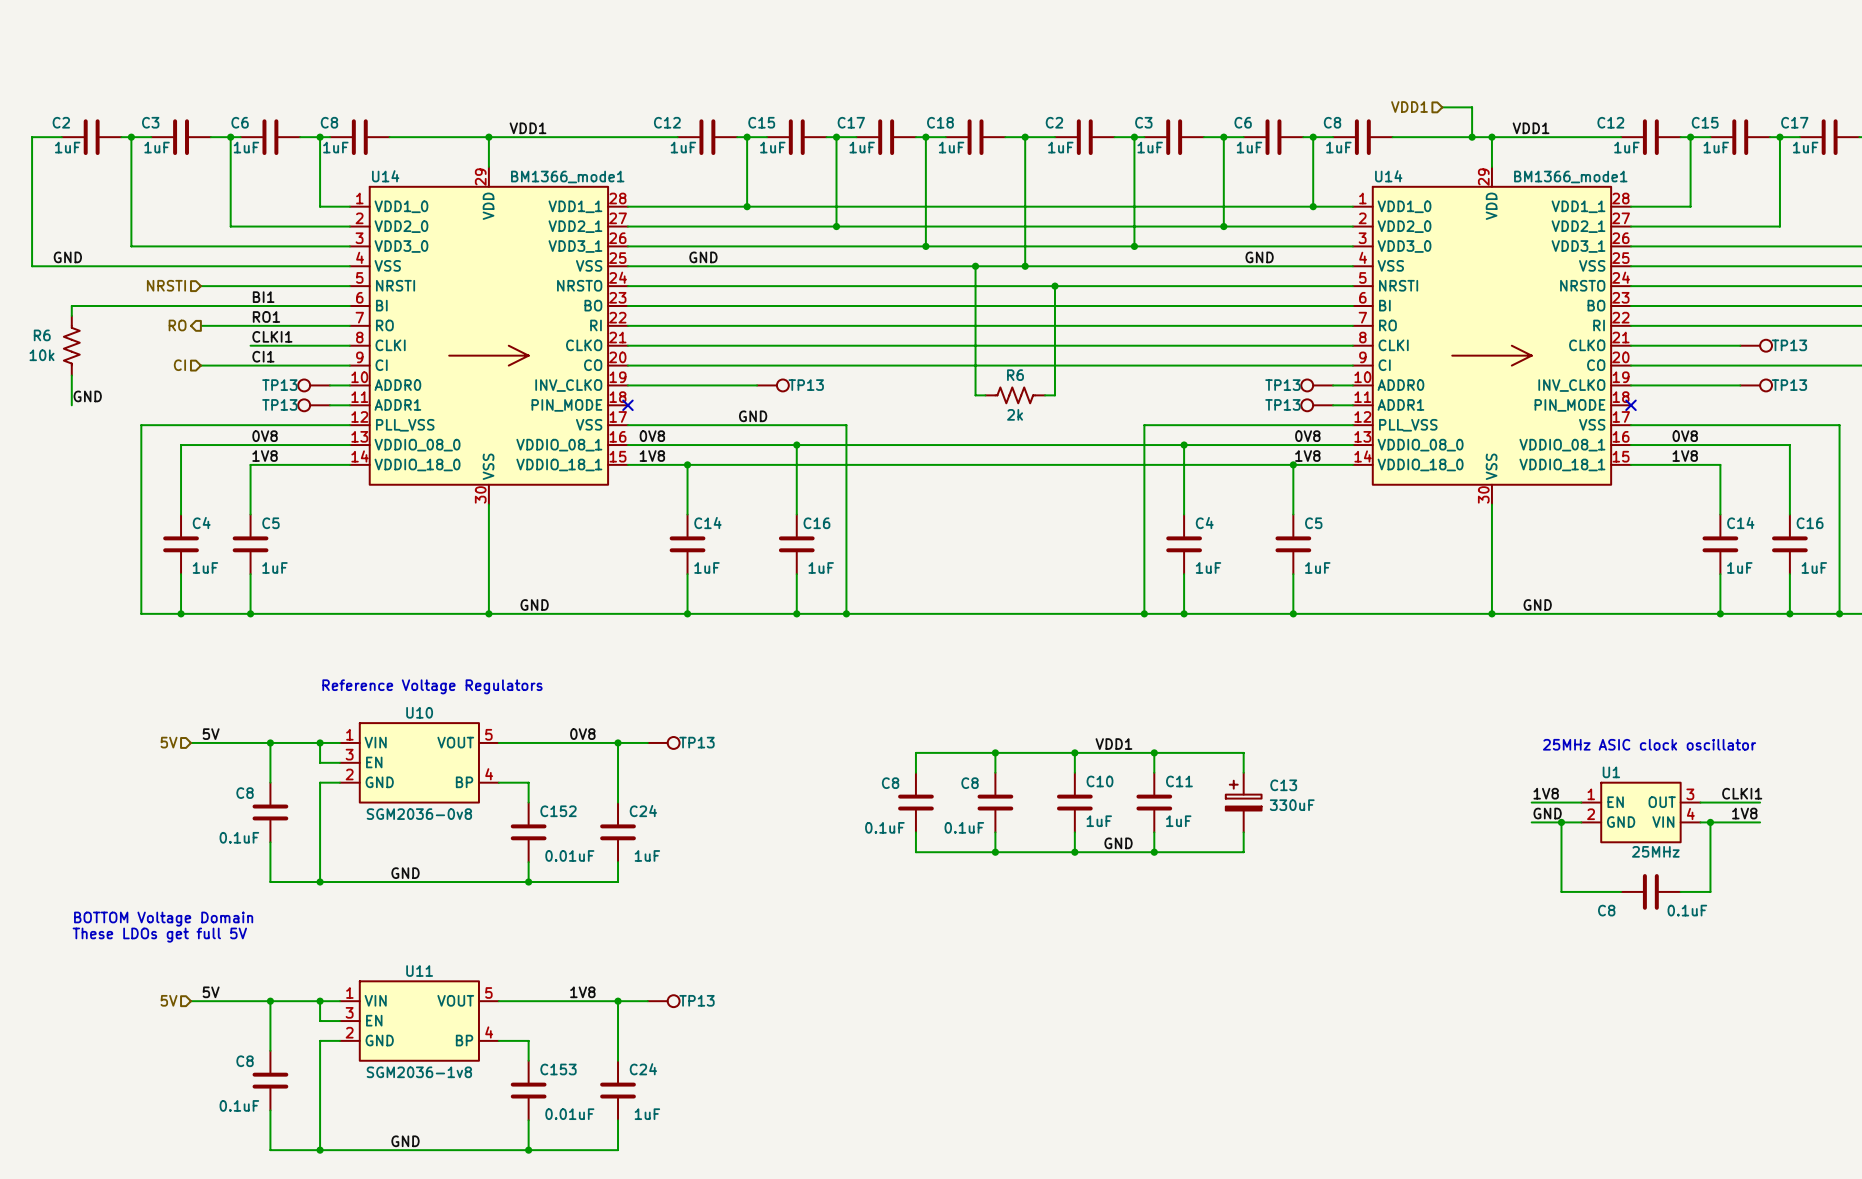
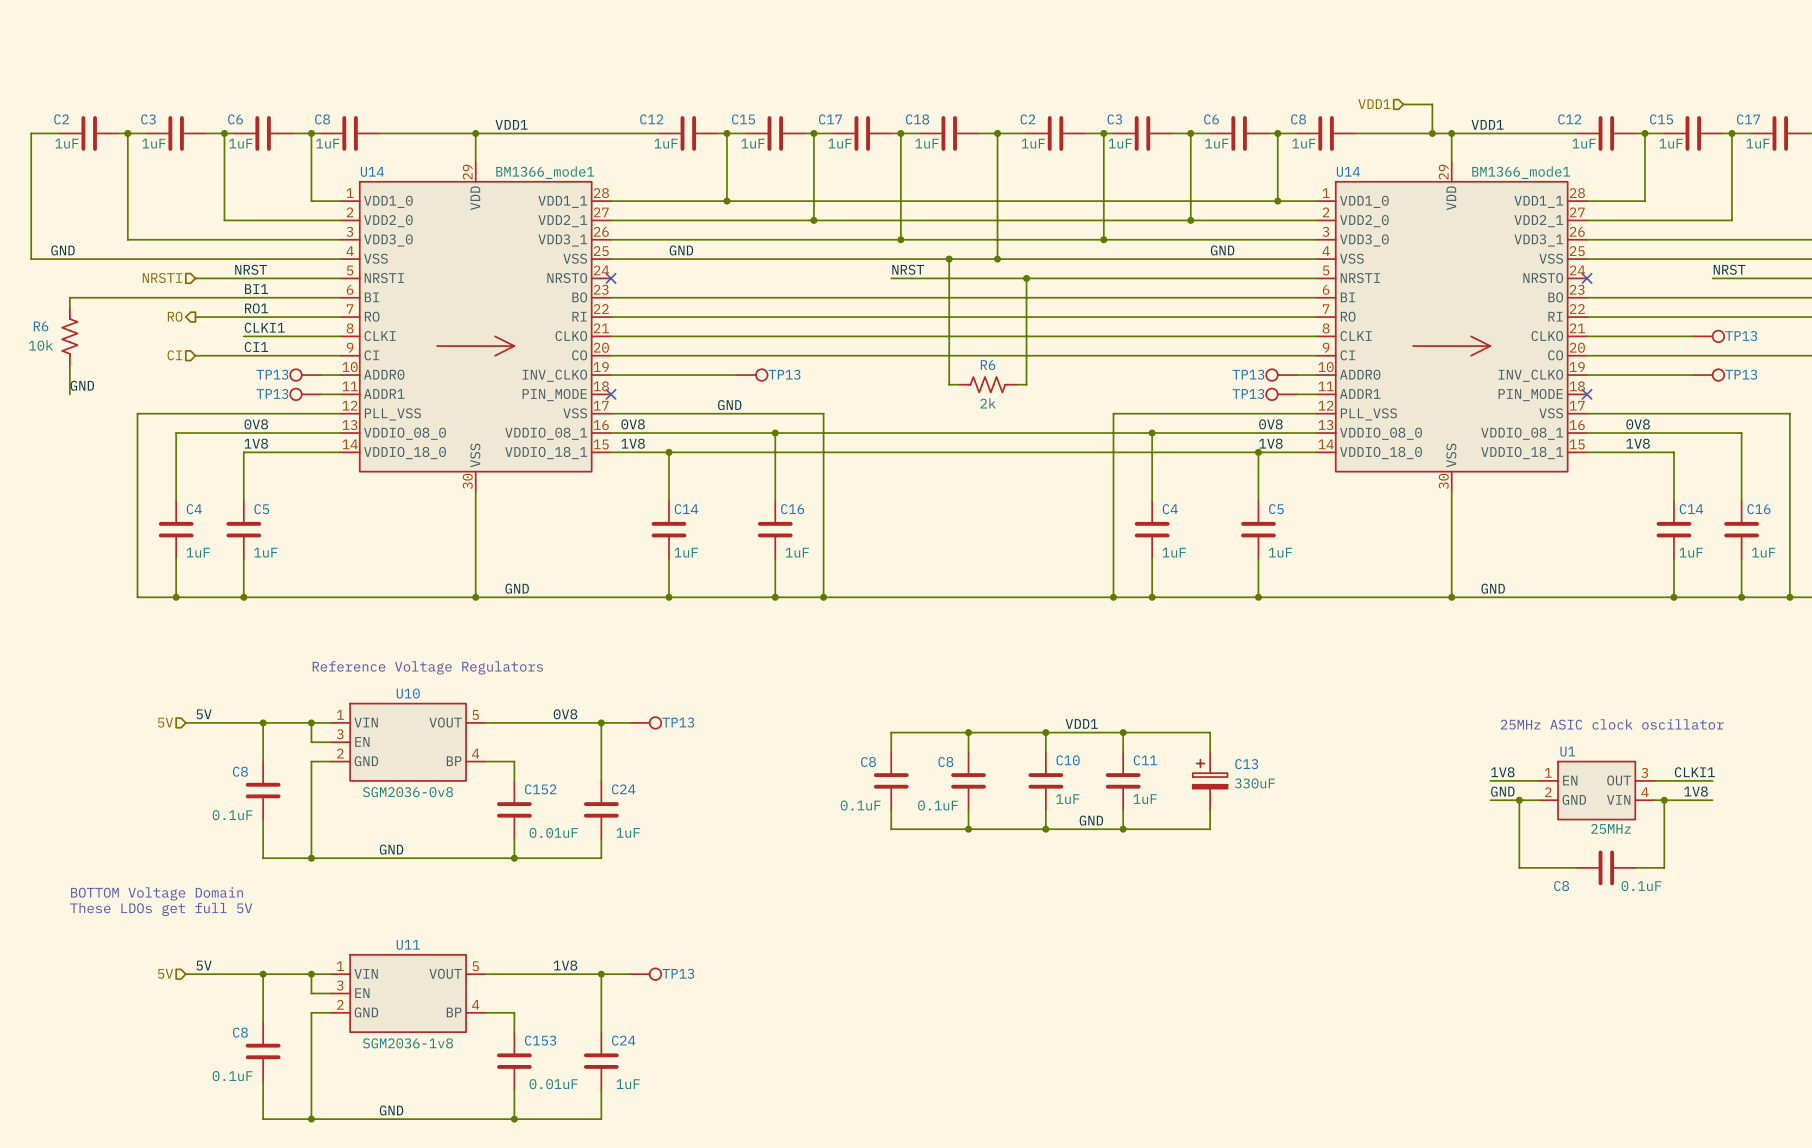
label: none -> NRST (251, 269)
label: none -> NRST (908, 269)
label: none -> NRST (1729, 269)
wire: (627, 286) (915, 286) -> none
no-connect mark: none -> (611, 278)
wire: (1631, 286) (1760, 286) -> none
no-connect mark: none -> (1586, 278)

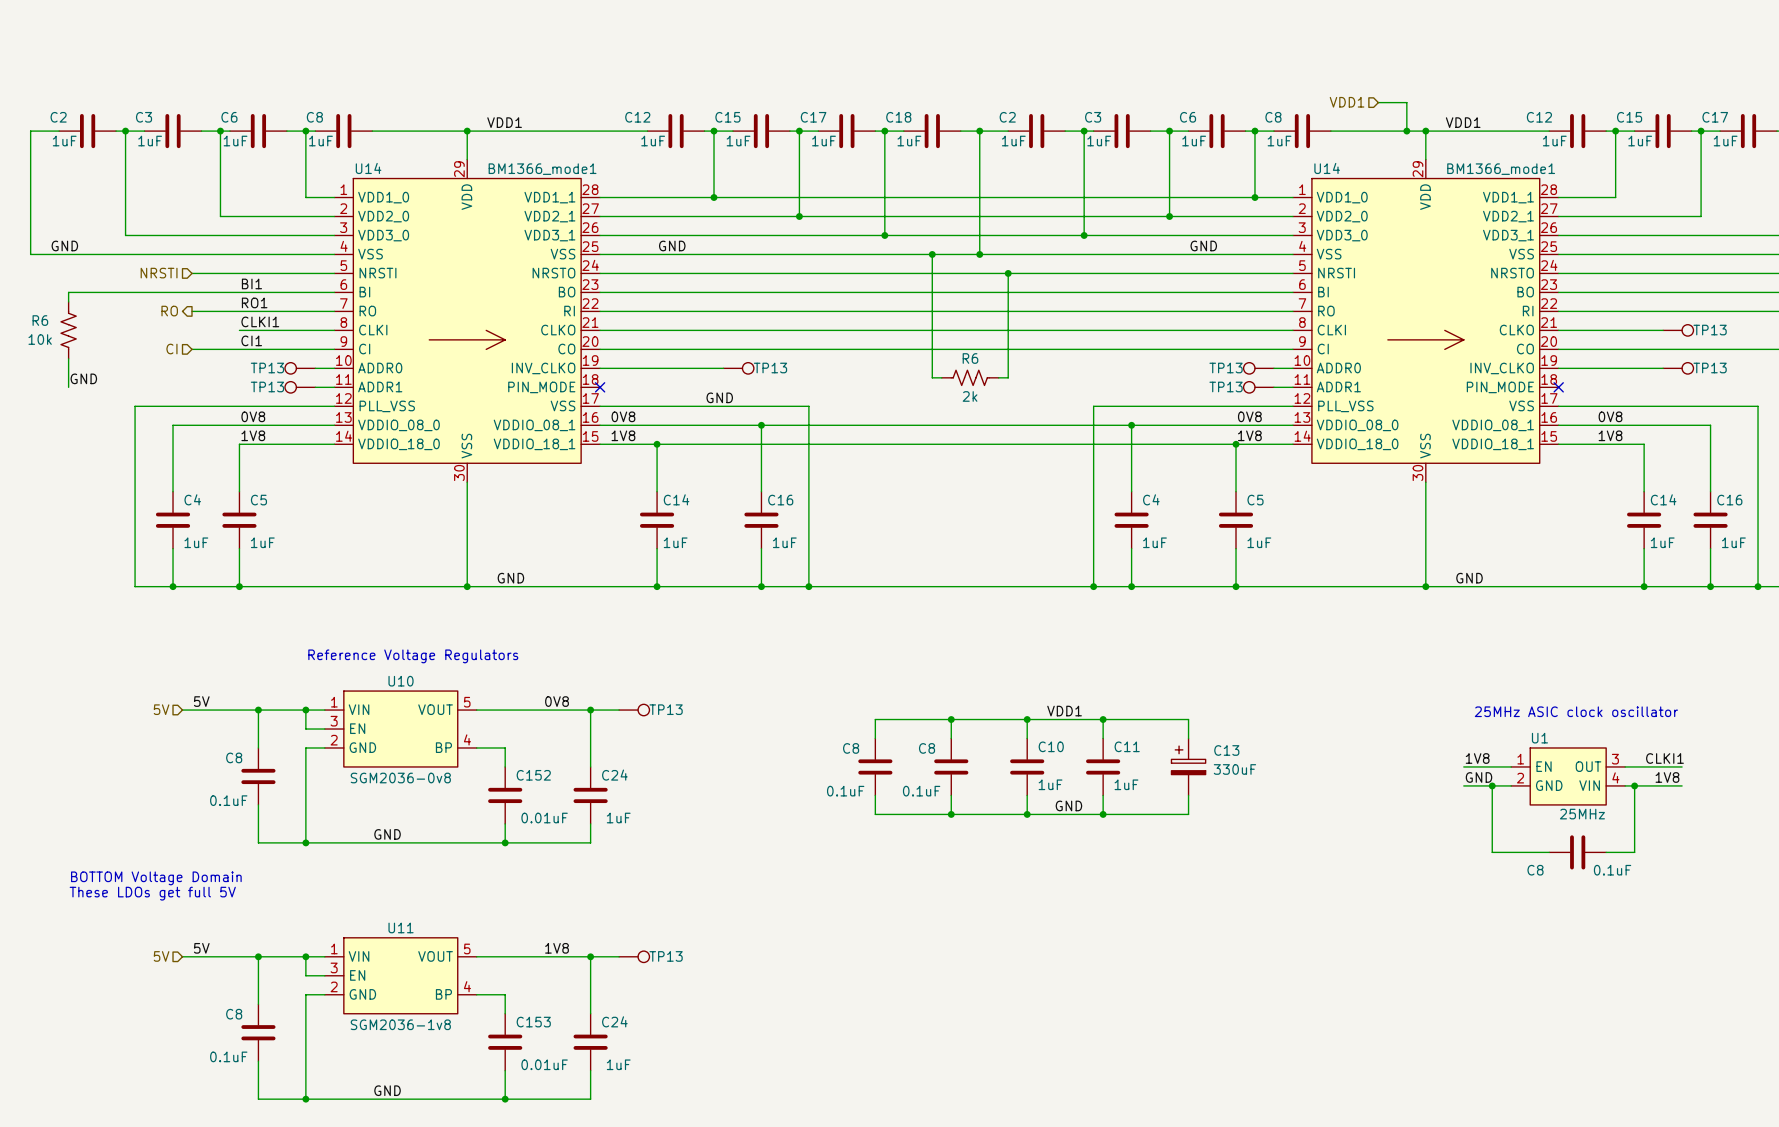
label: NRST (251, 269) -> none
label: NRST (908, 269) -> none
label: NRST (1729, 269) -> none
wire: none -> (600, 273) (875, 273)
no-connect mark: (611, 278) -> none
wire: none -> (1558, 273) (1682, 273)
no-connect mark: (1586, 278) -> none

